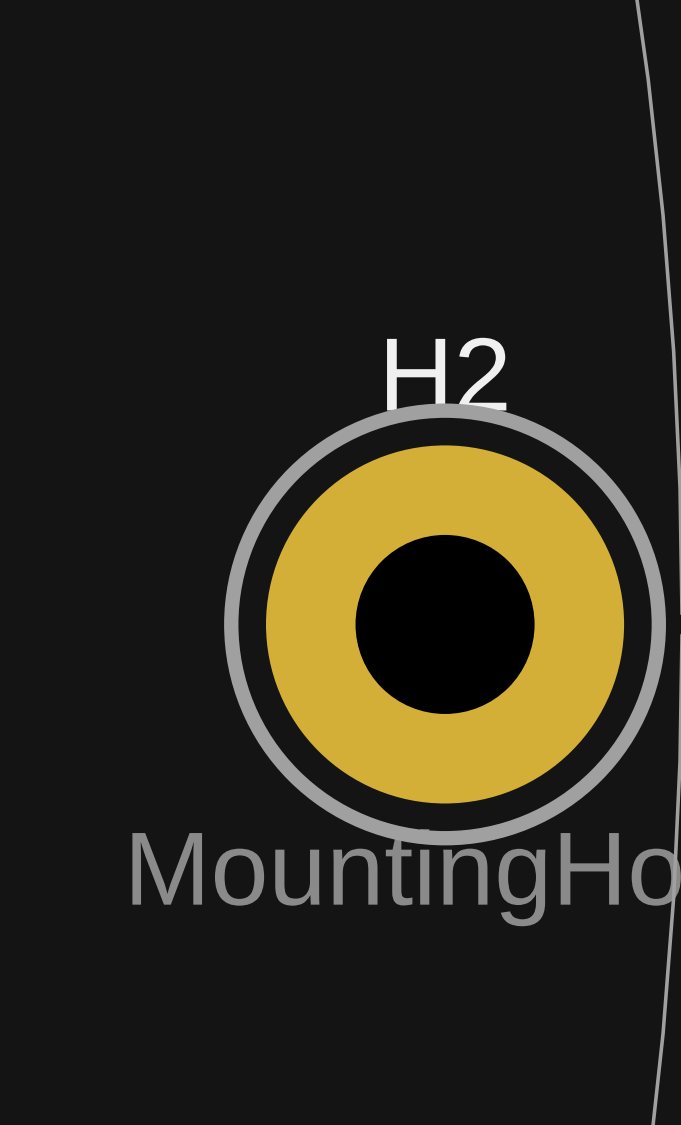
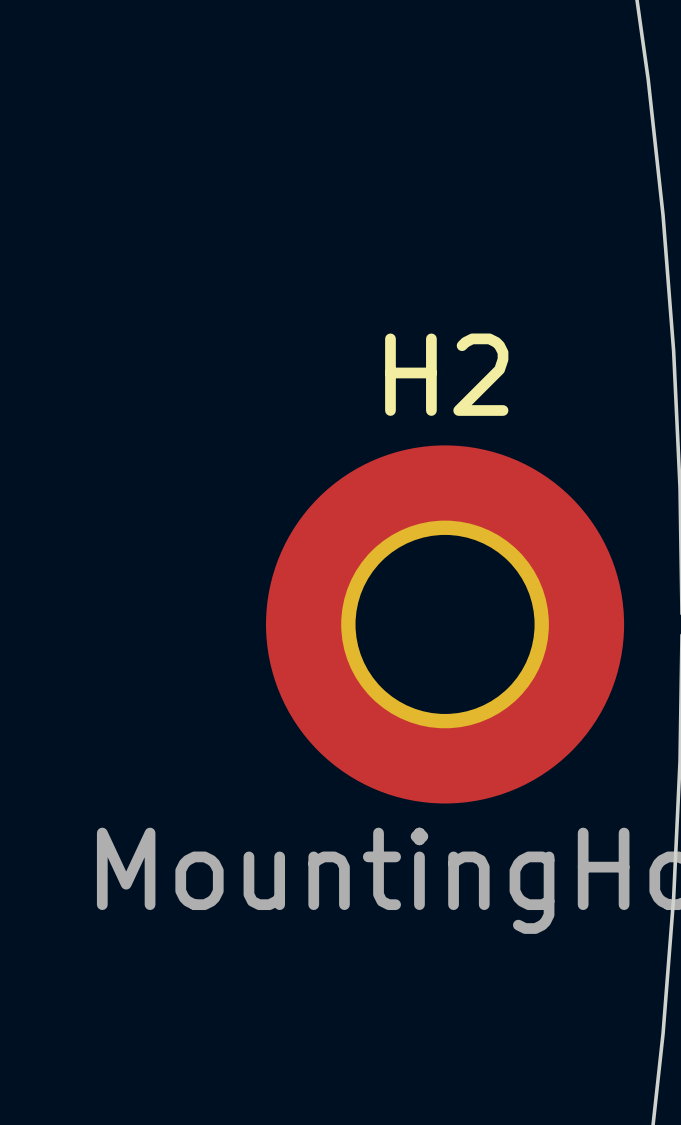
round board edge: [224, 403, 666, 846] -> none

